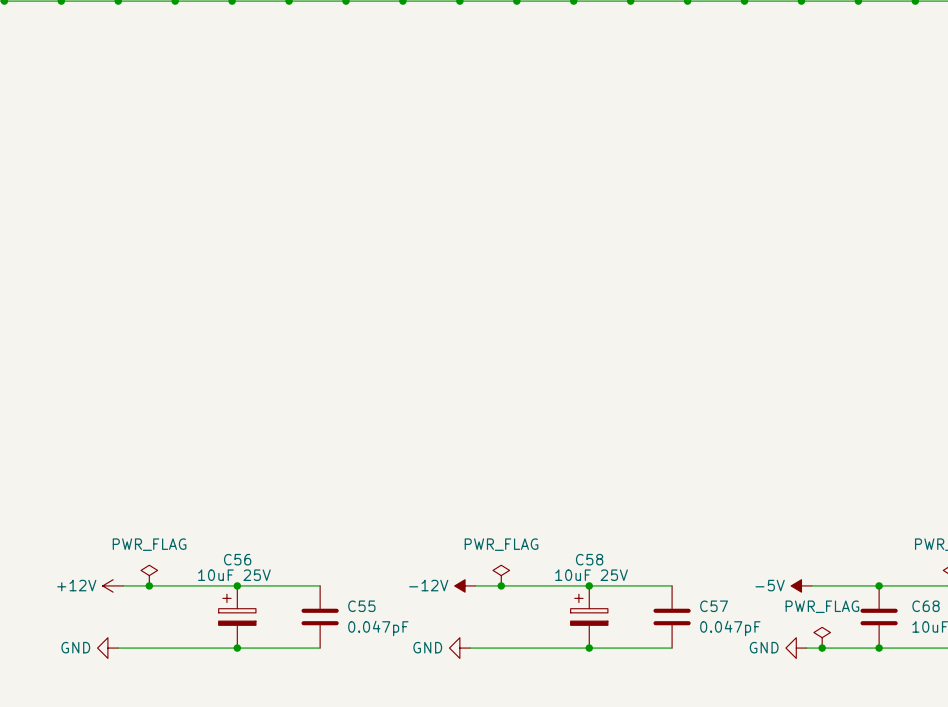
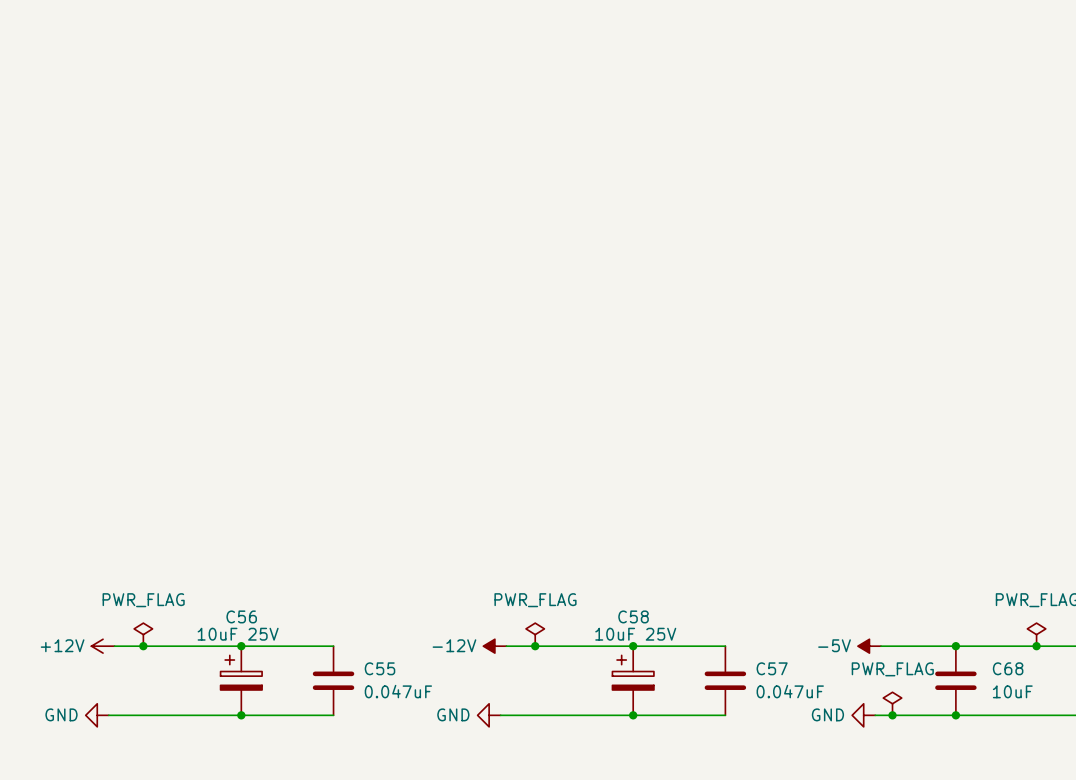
C55 value: 0.047pF (378, 628) -> 0.047uF (398, 691)
C57 value: 0.047pF (730, 628) -> 0.047uF (790, 691)

